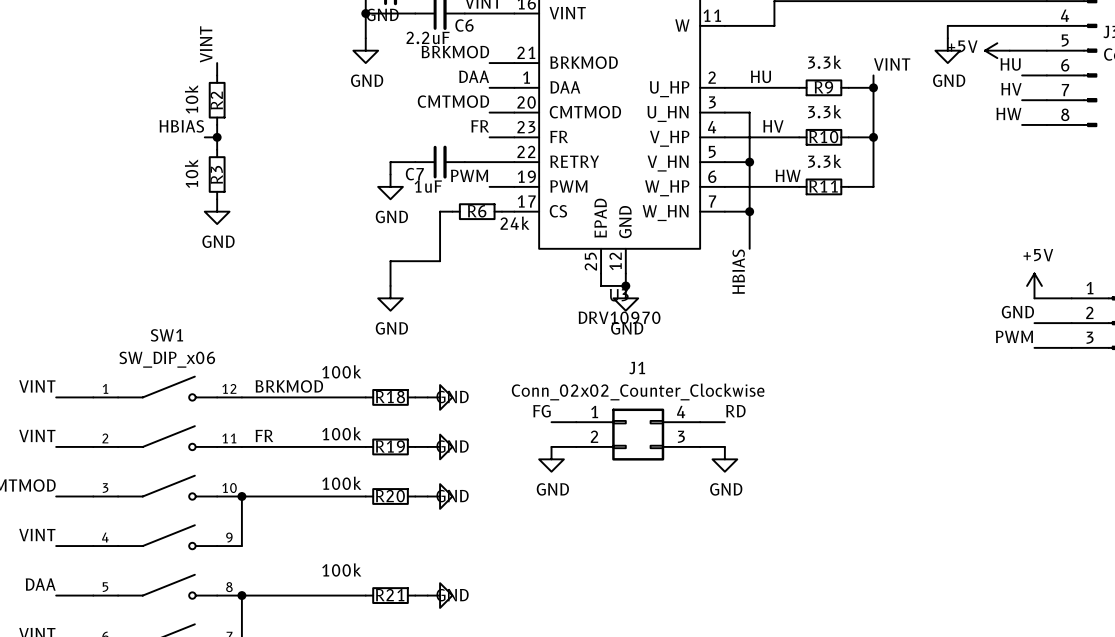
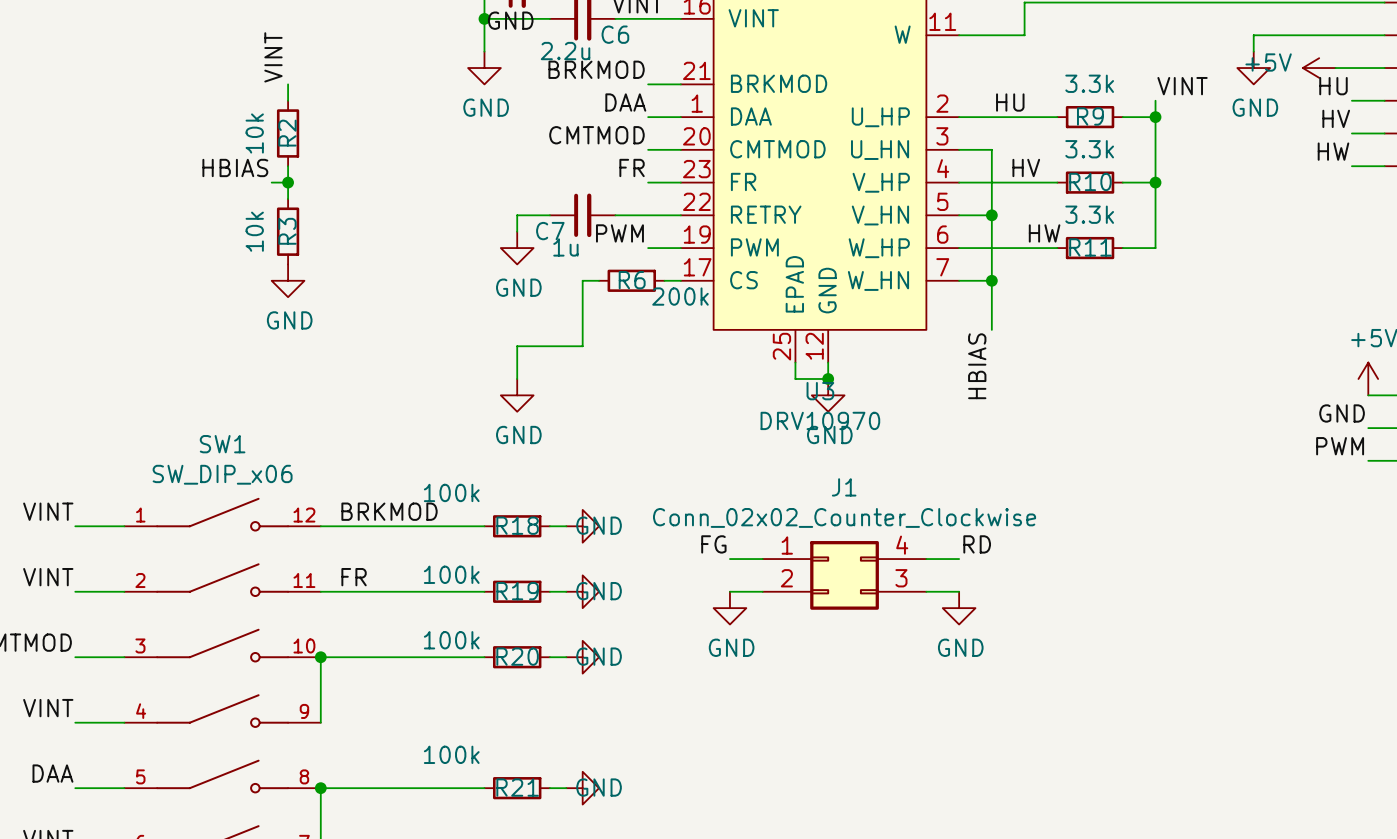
C6 value: 2.2uF (428, 37) -> 2.2u (565, 51)
C7 value: 1uF (428, 186) -> 1u (565, 247)
R6 value: 24k (514, 223) -> 200k (680, 296)

